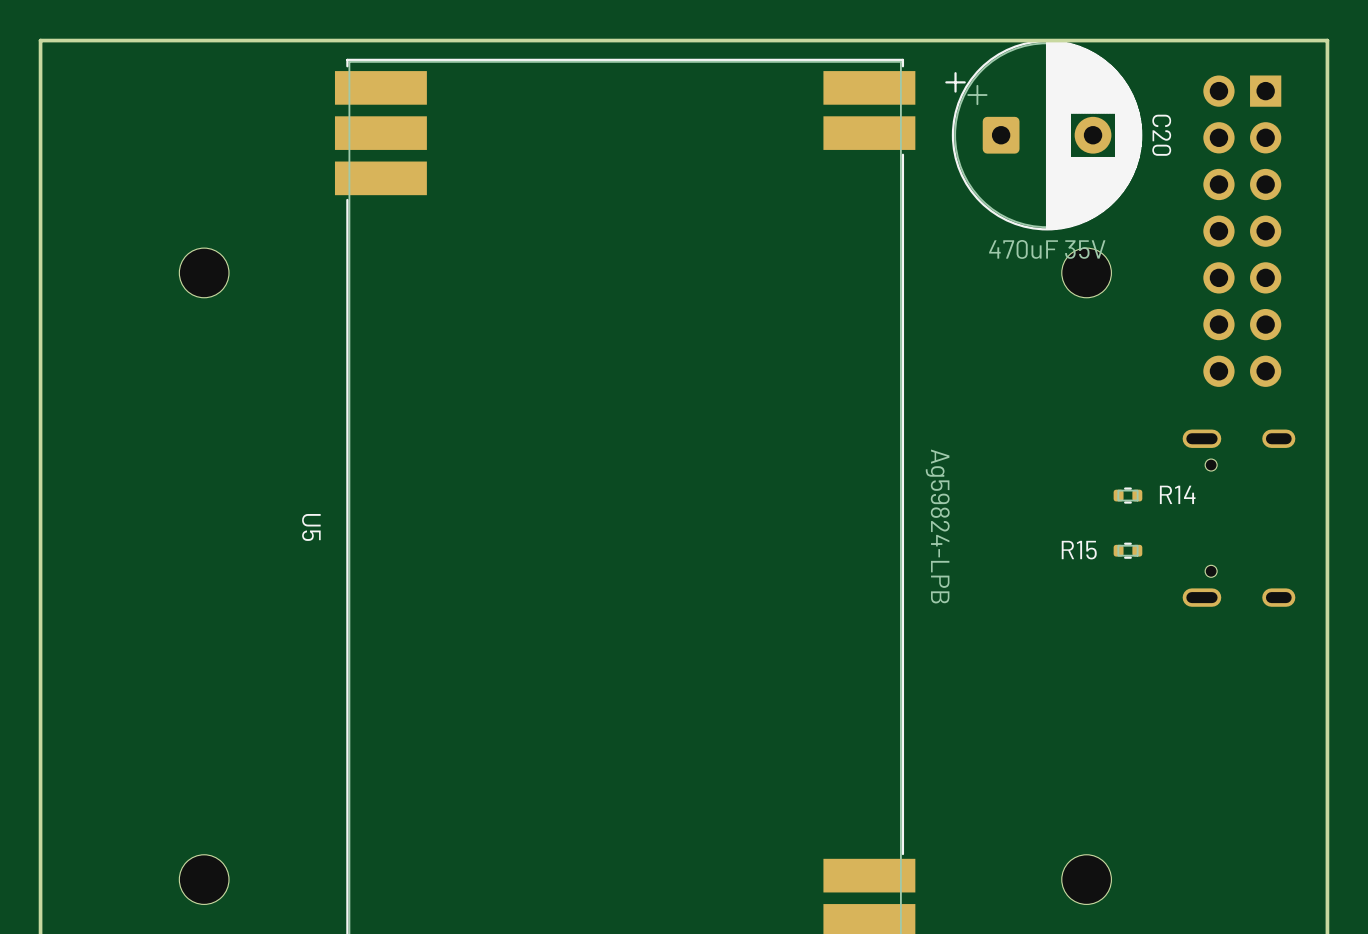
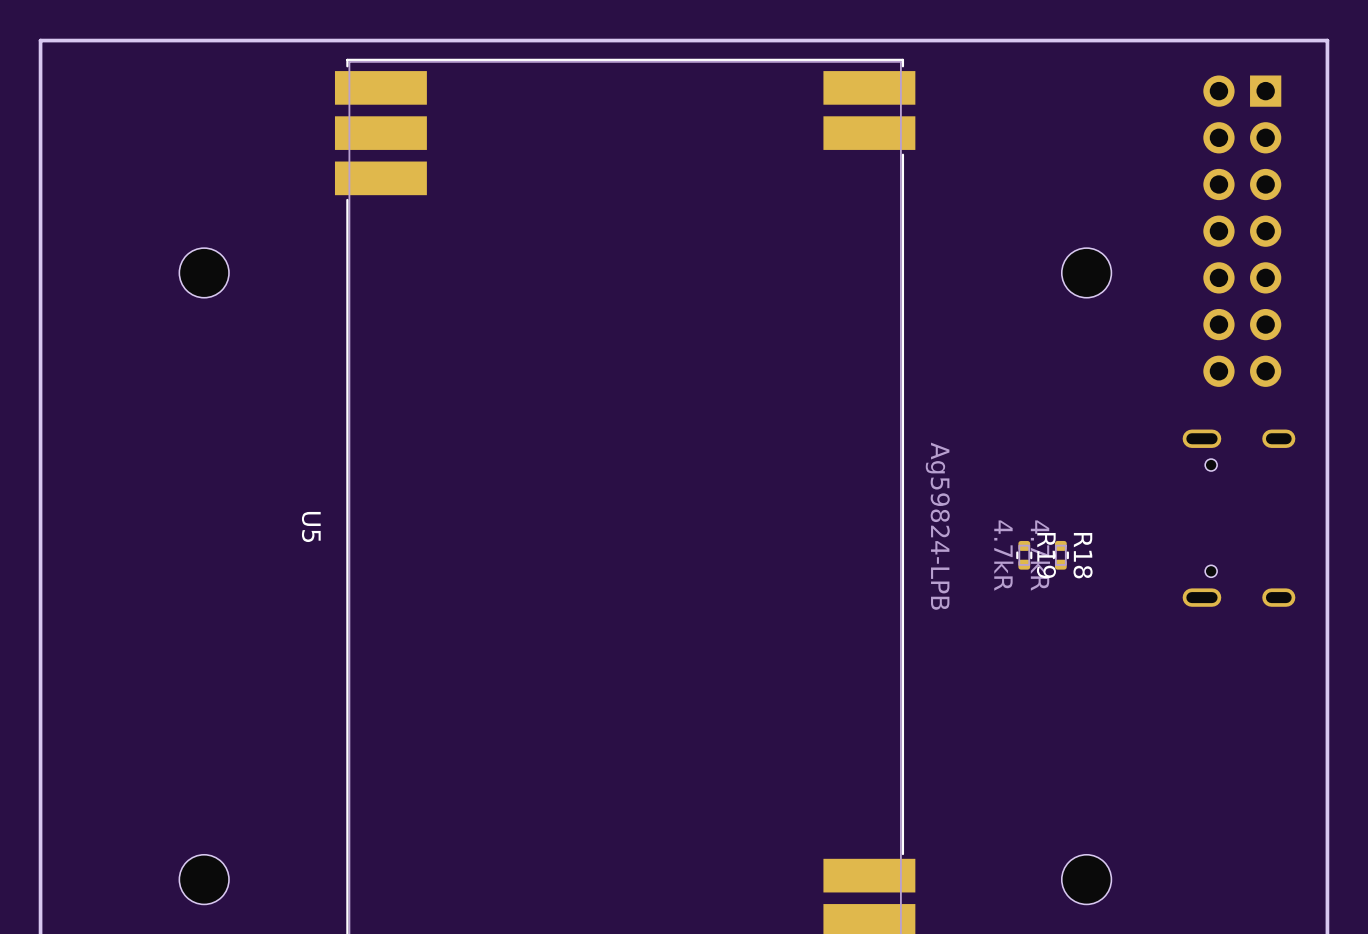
C20: 470uF 35V (1043, 135) -> none
R14: (1127, 495) -> none
R15: (1127, 550) -> none
R19: none -> 4.7kR (1024, 555)
R18: none -> 4.7kR (1060, 555)

